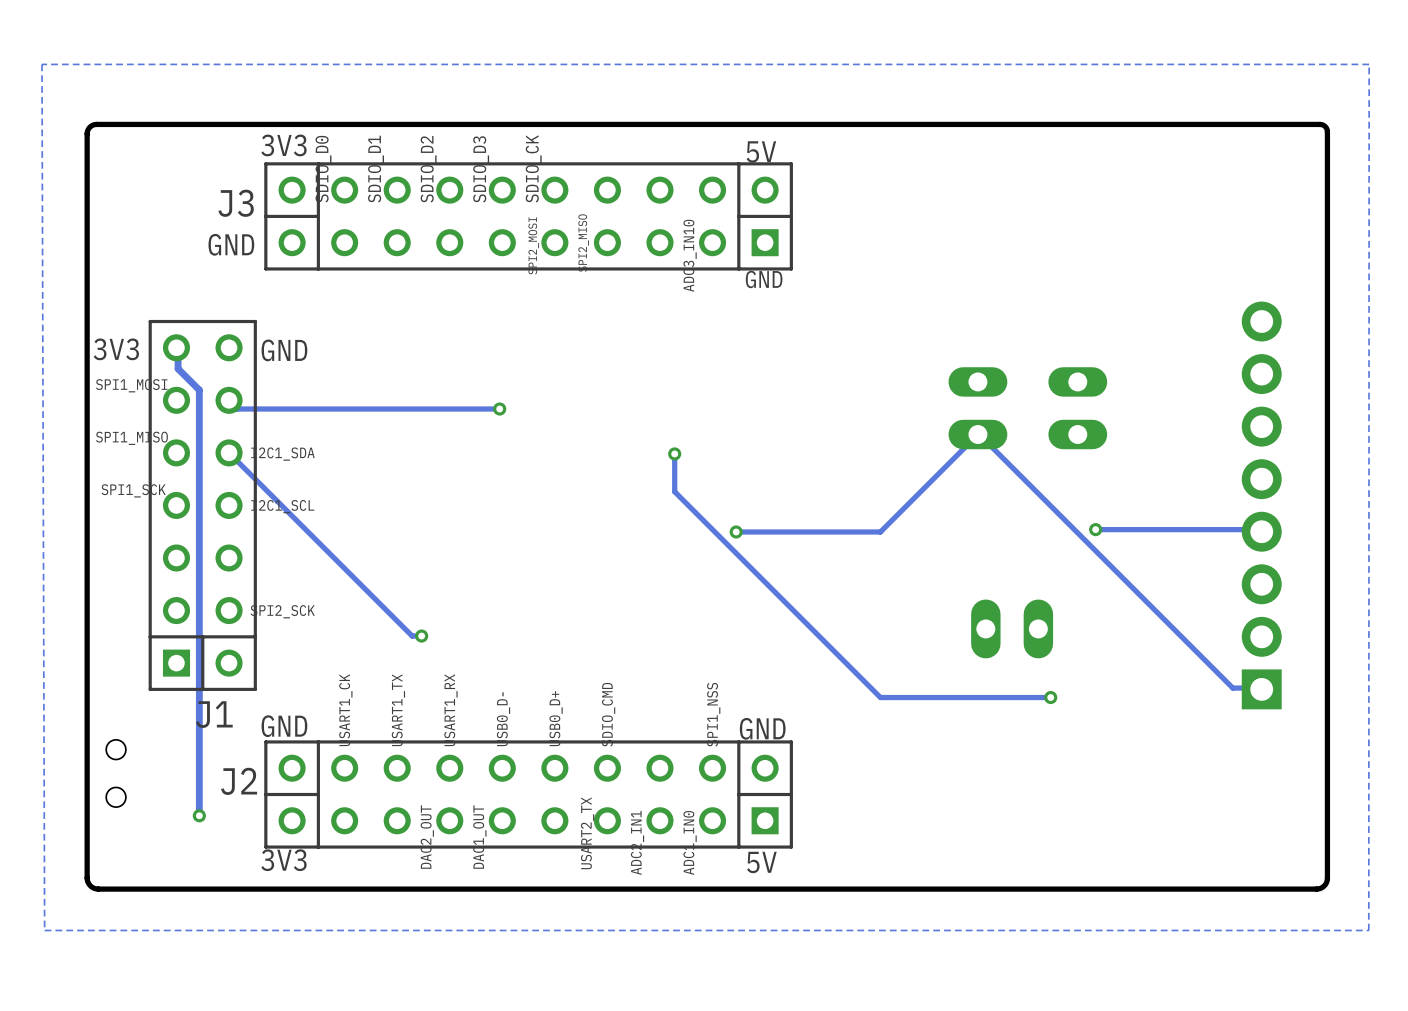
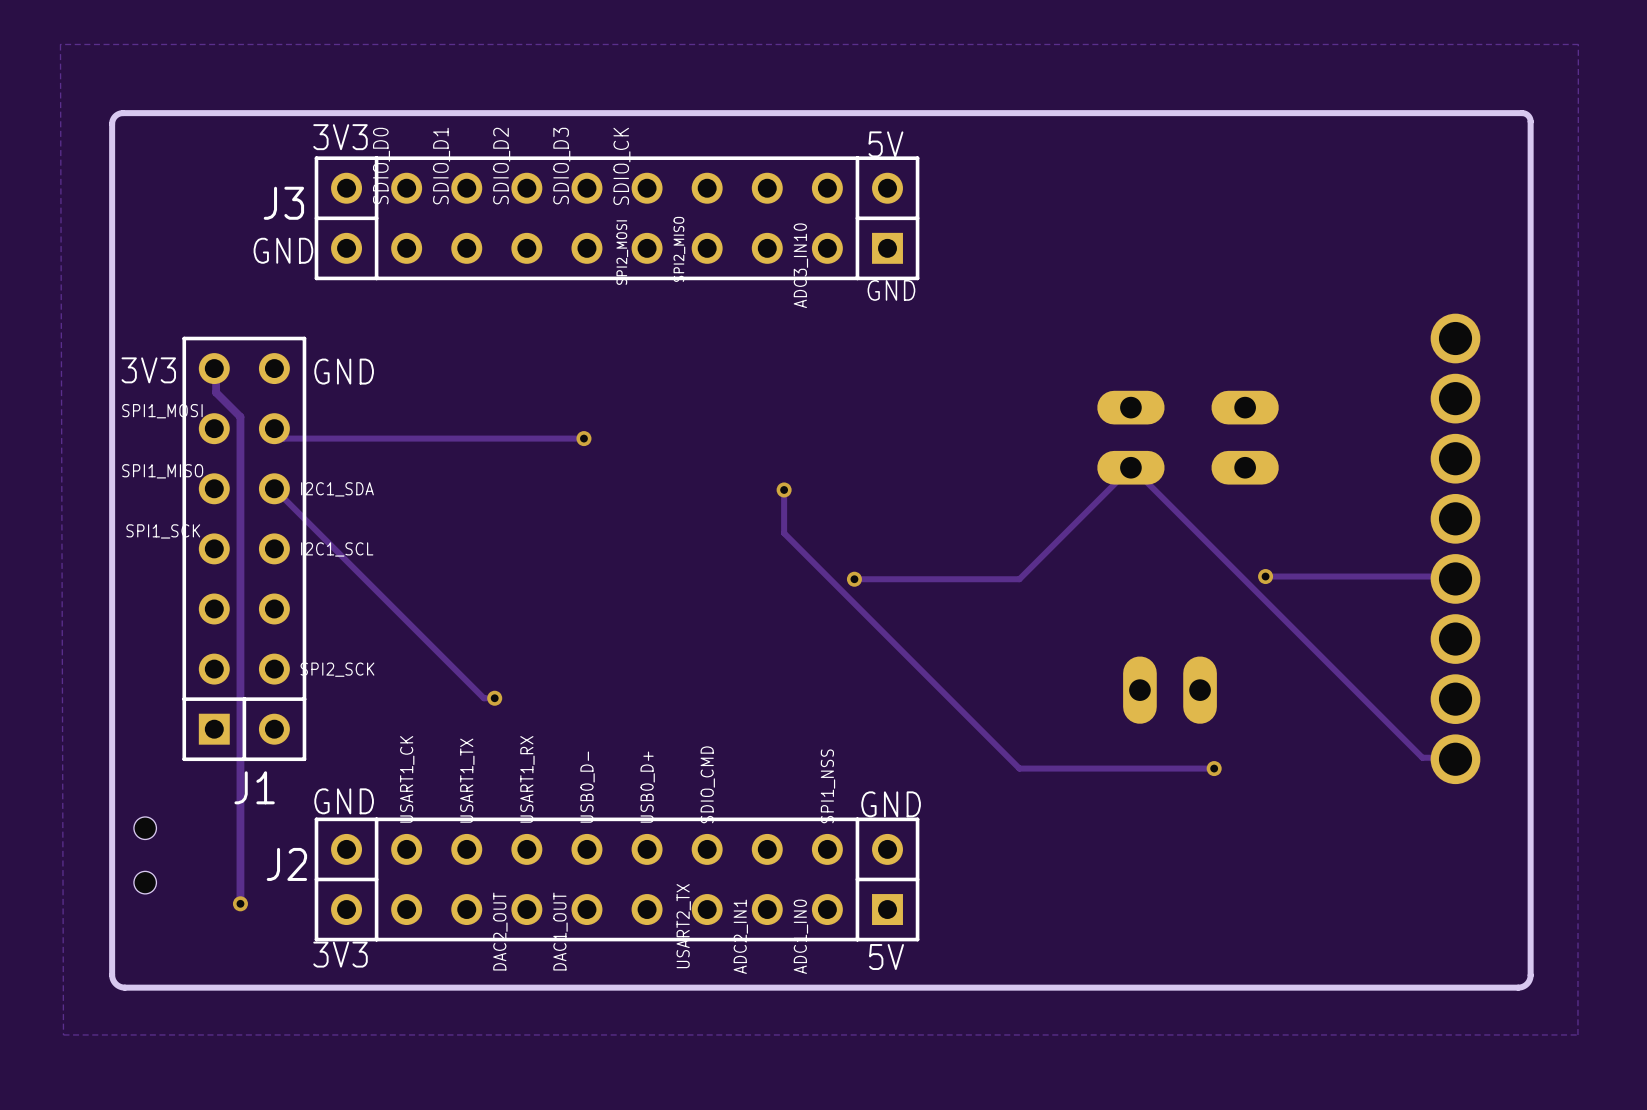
part footprint: [1241, 301, 1282, 710] -> [1430, 313, 1481, 785]

